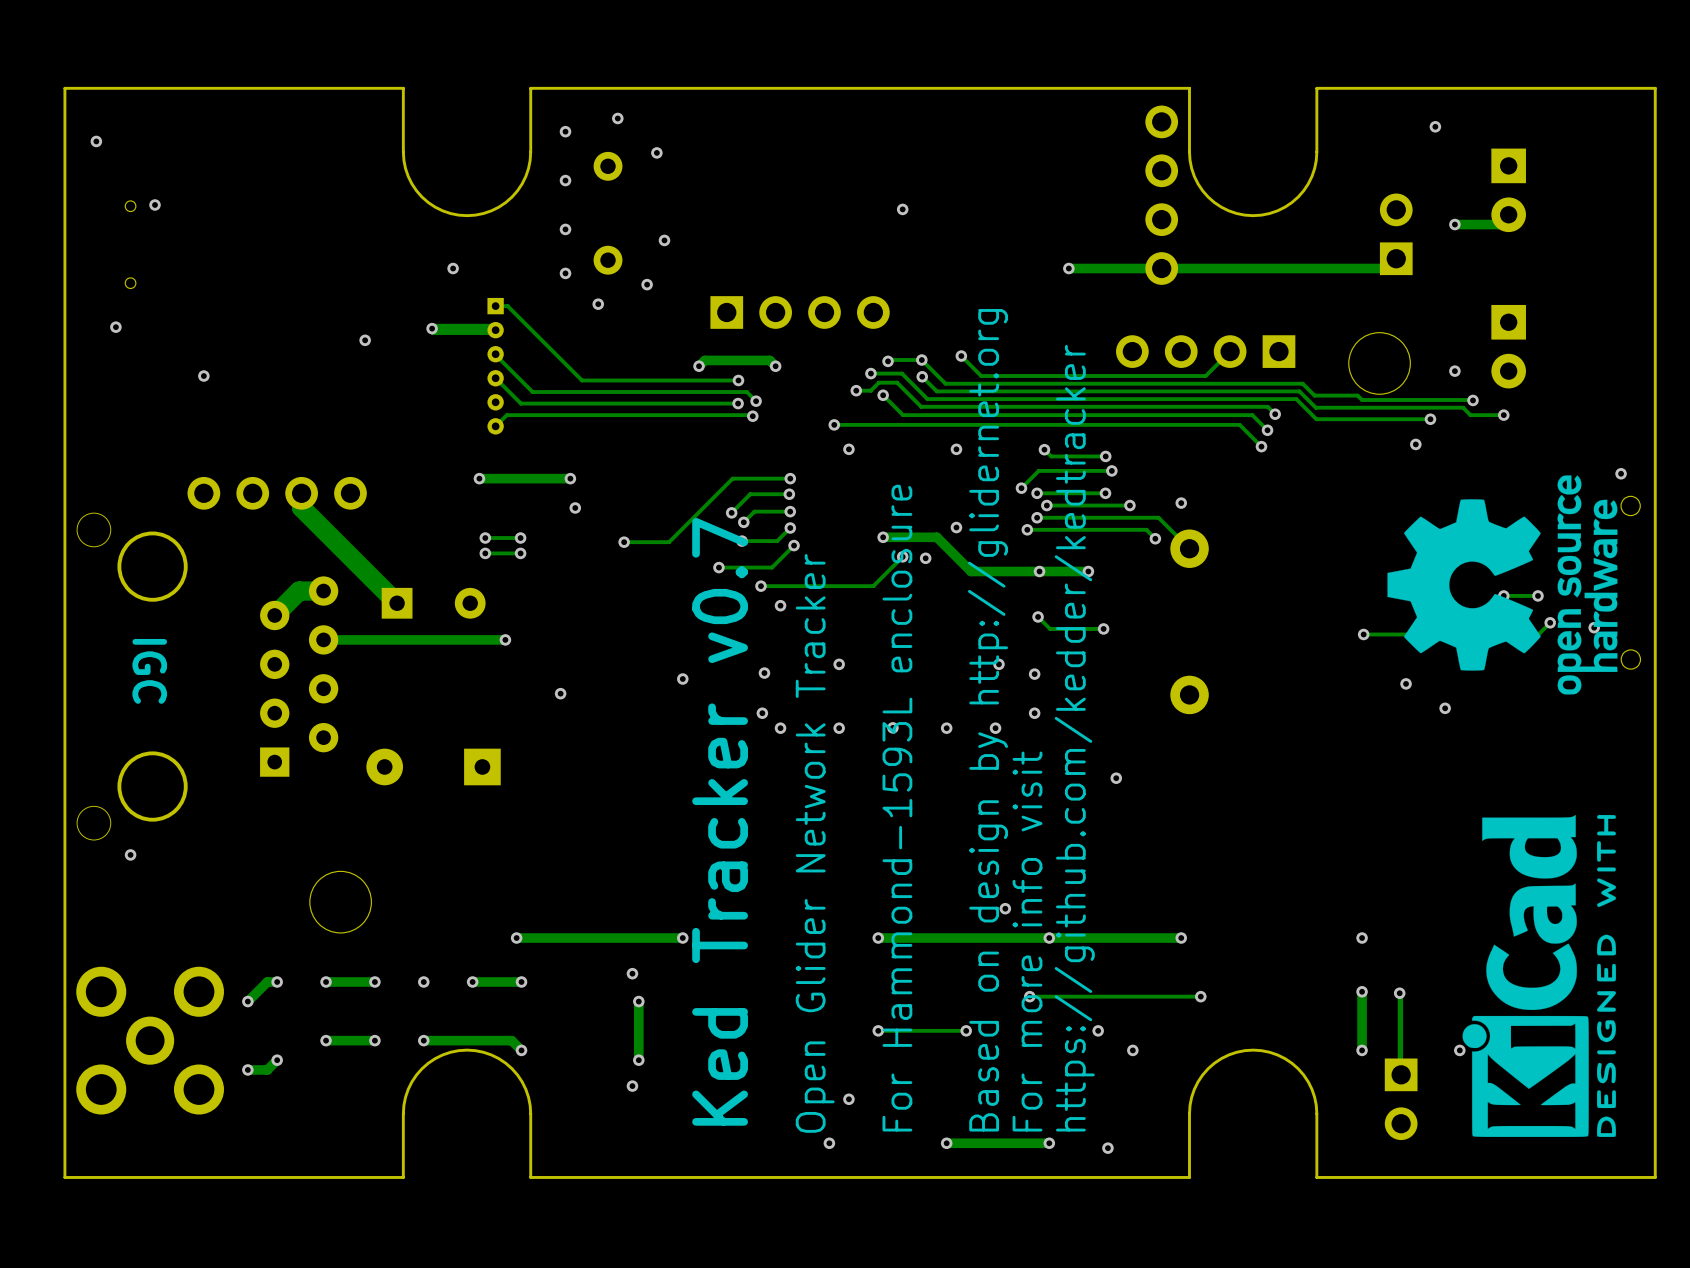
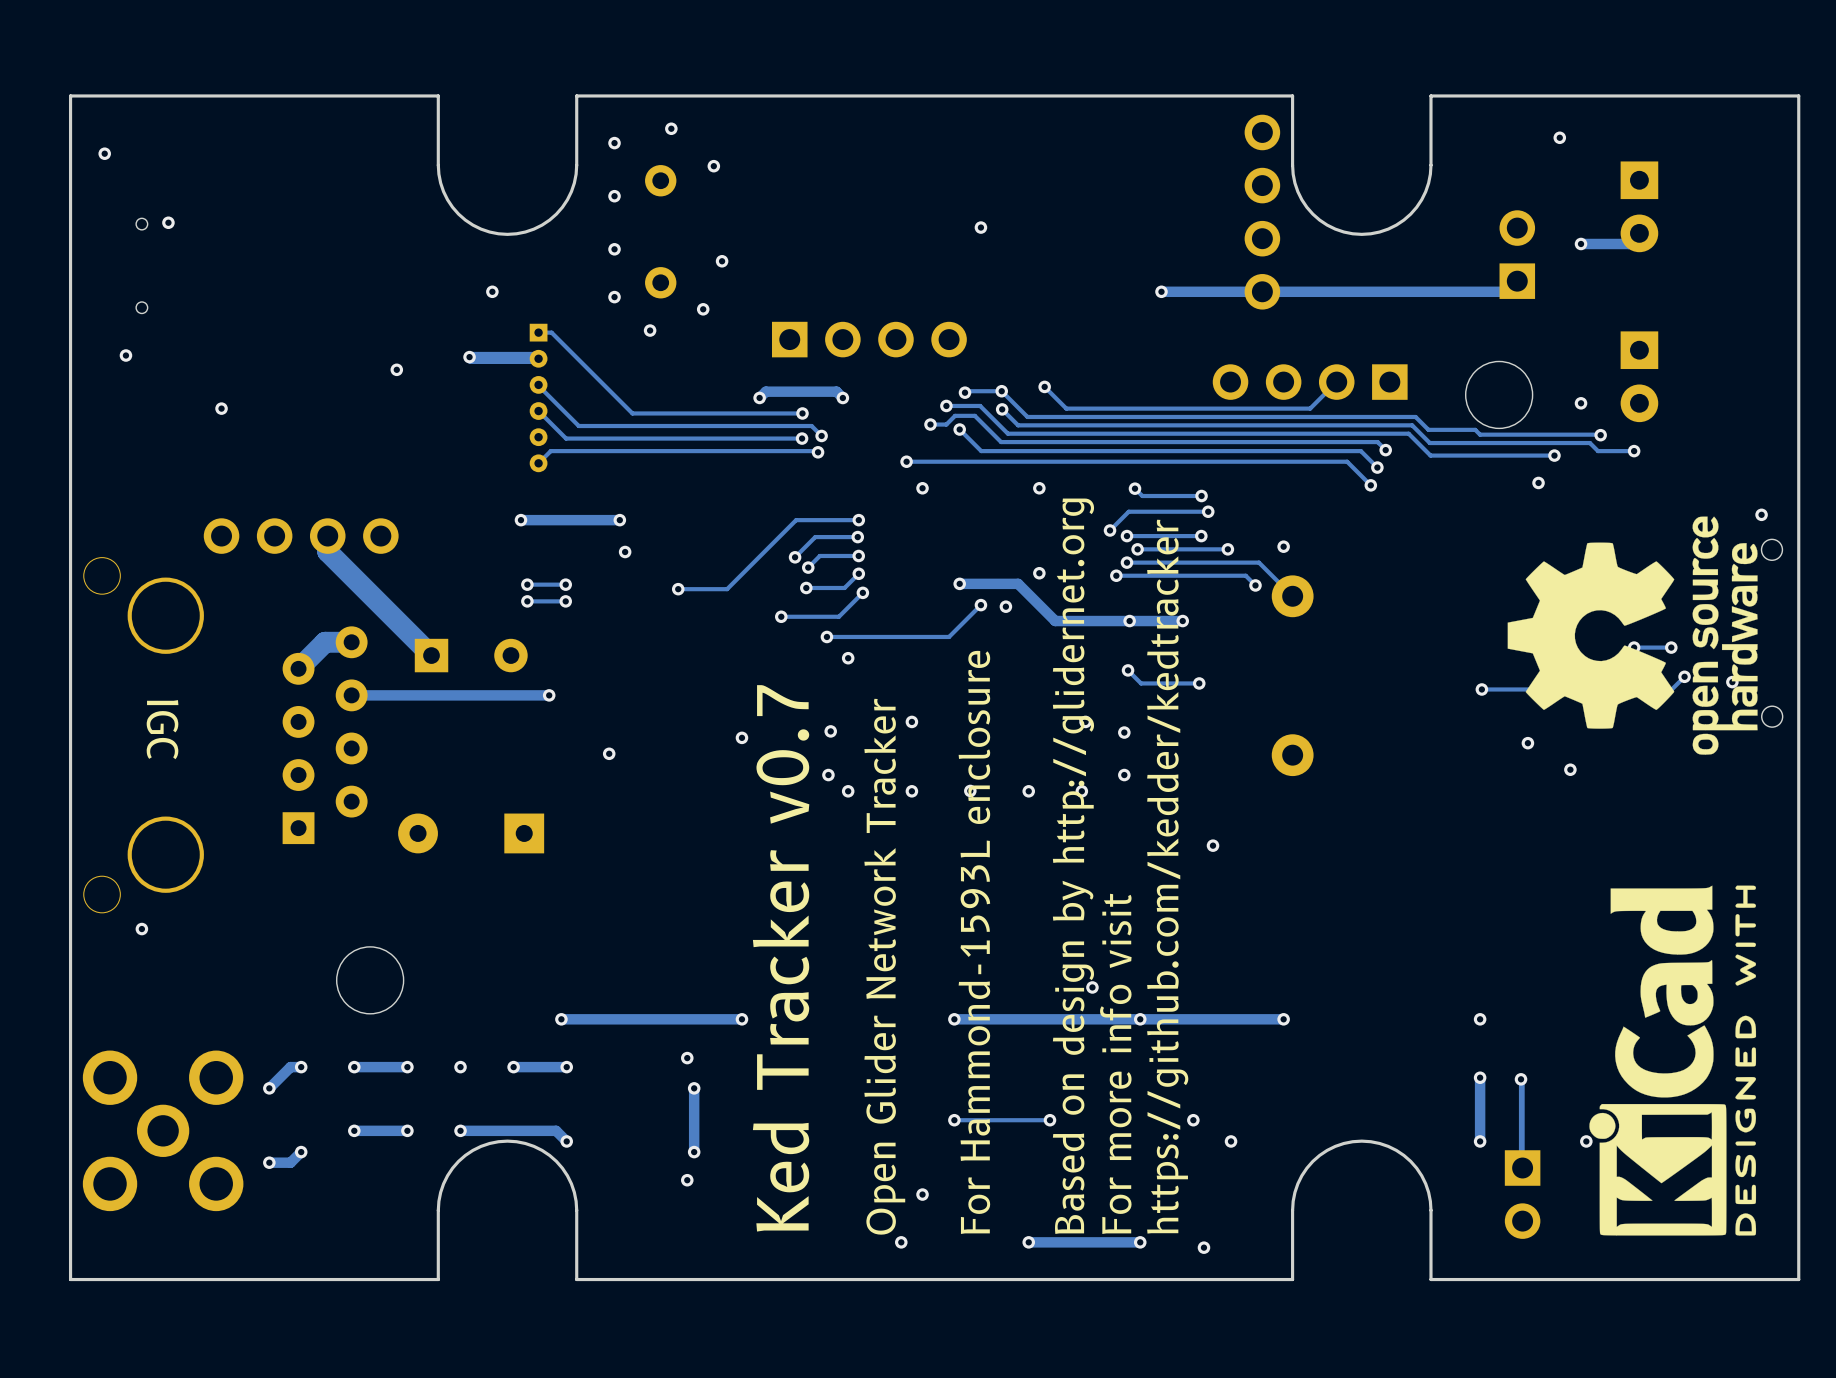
via: (1029, 996) -> none
track: (1200, 996) (1029, 996) -> none
via: (1200, 996) -> none

